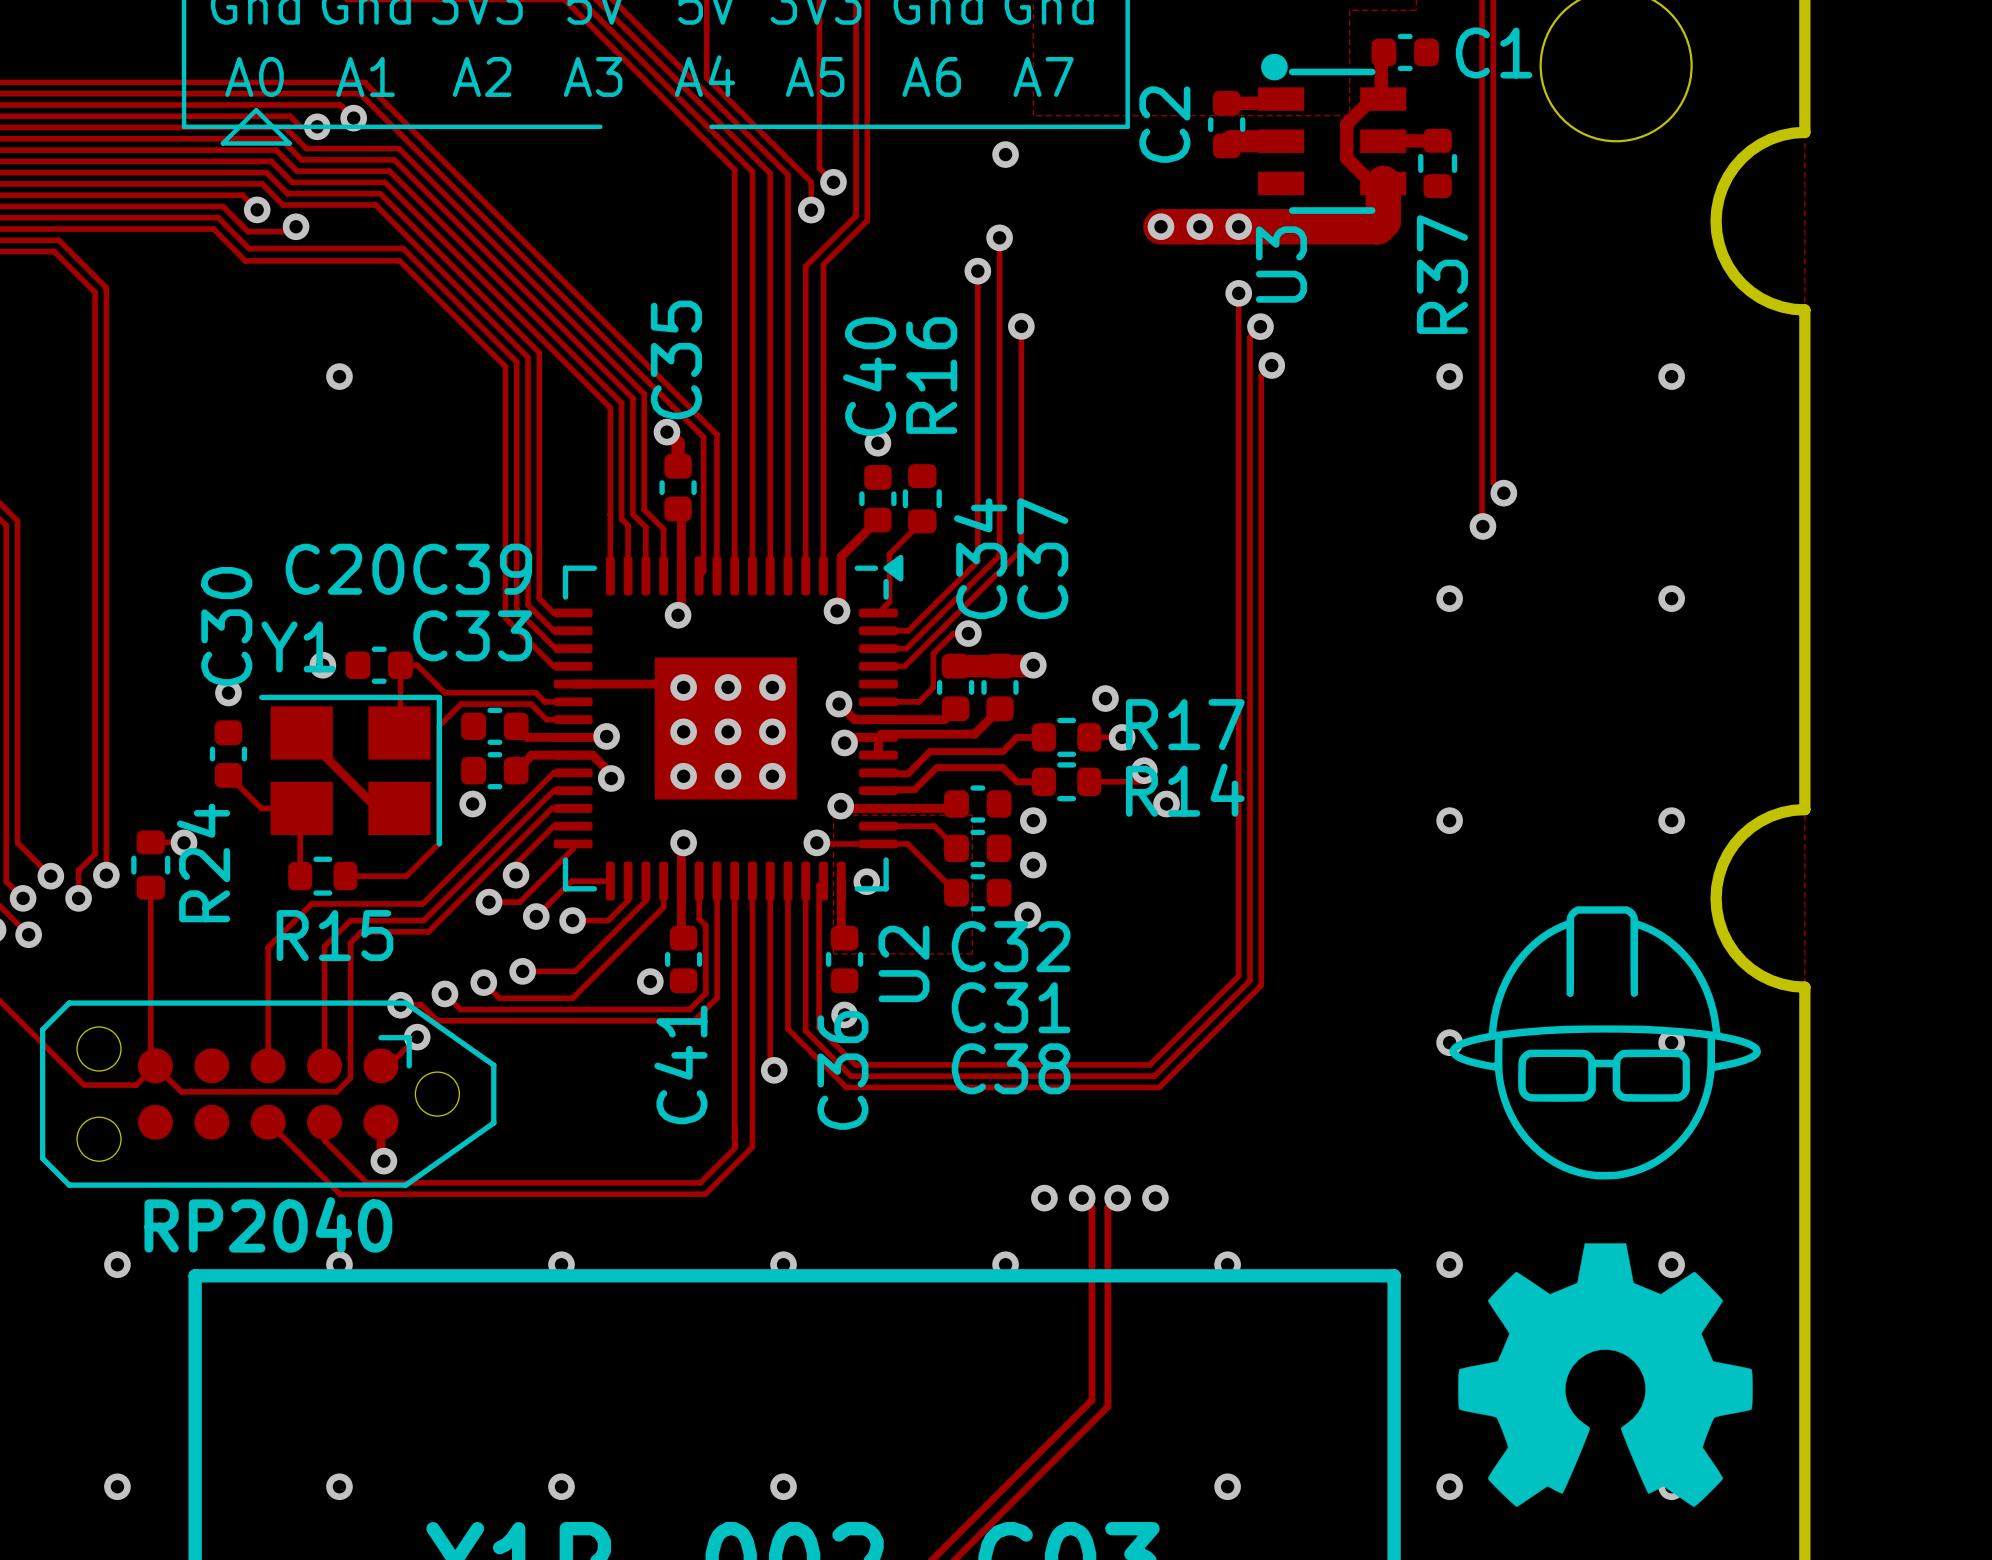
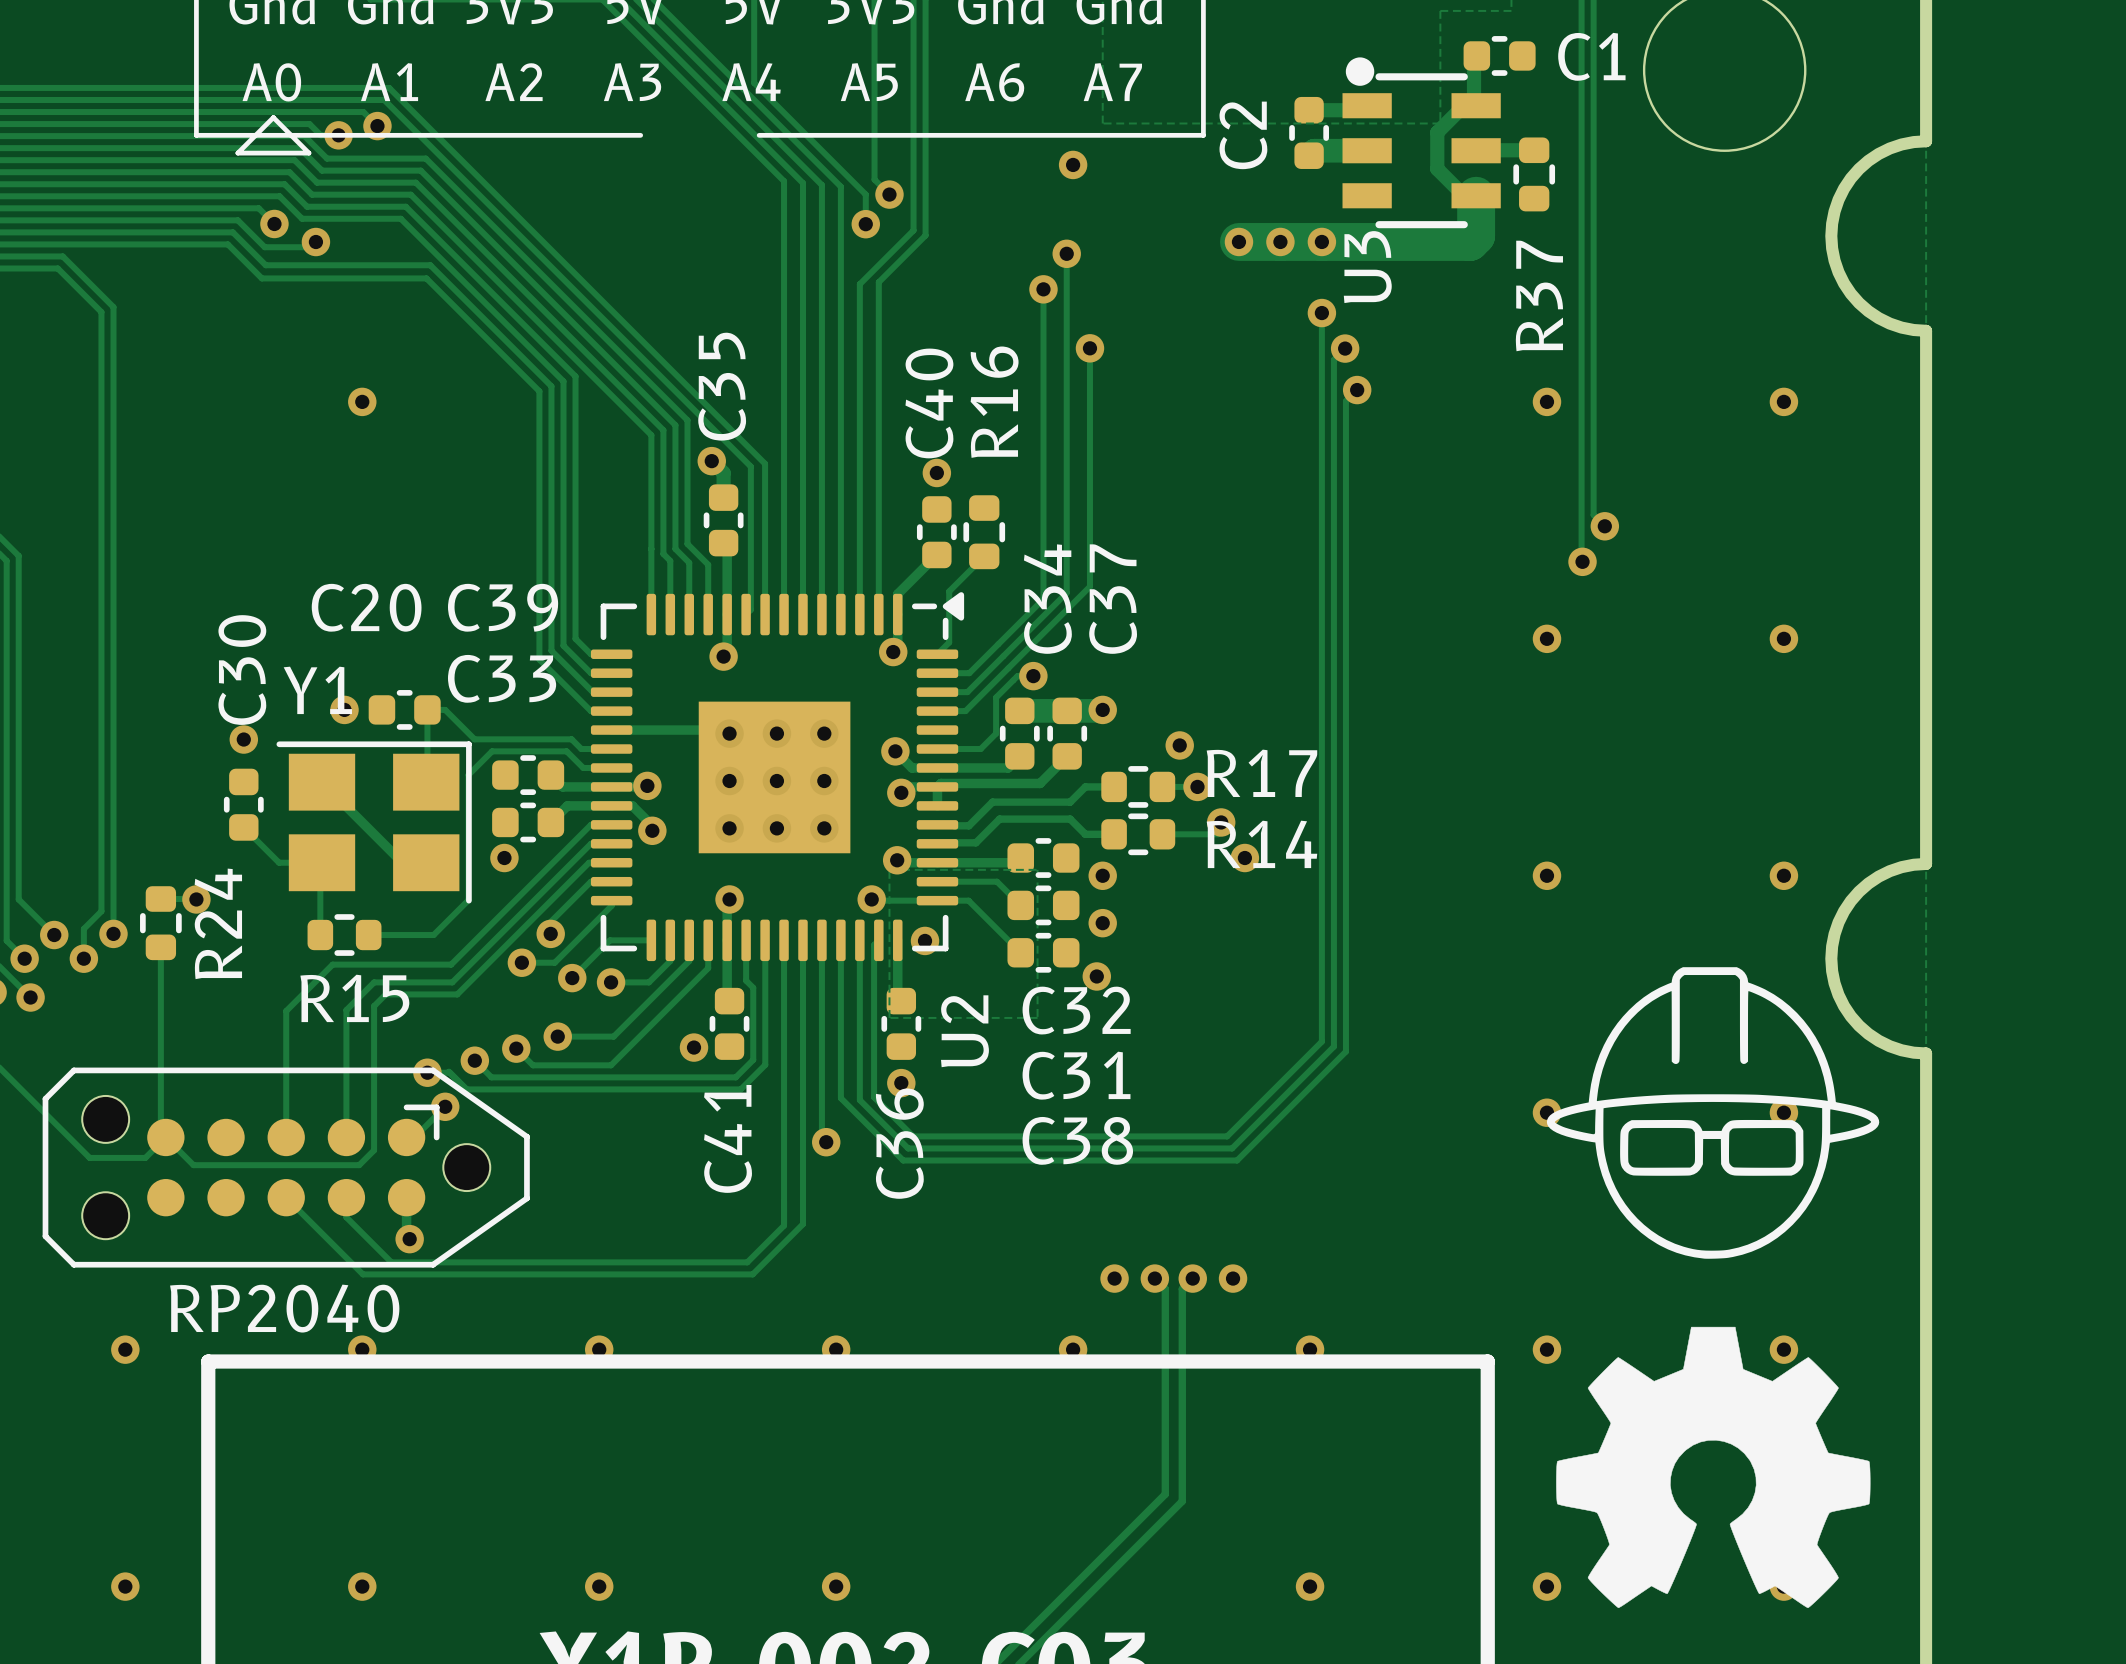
U3 name position: U3 (1281, 264) -> U3 (1367, 267)

